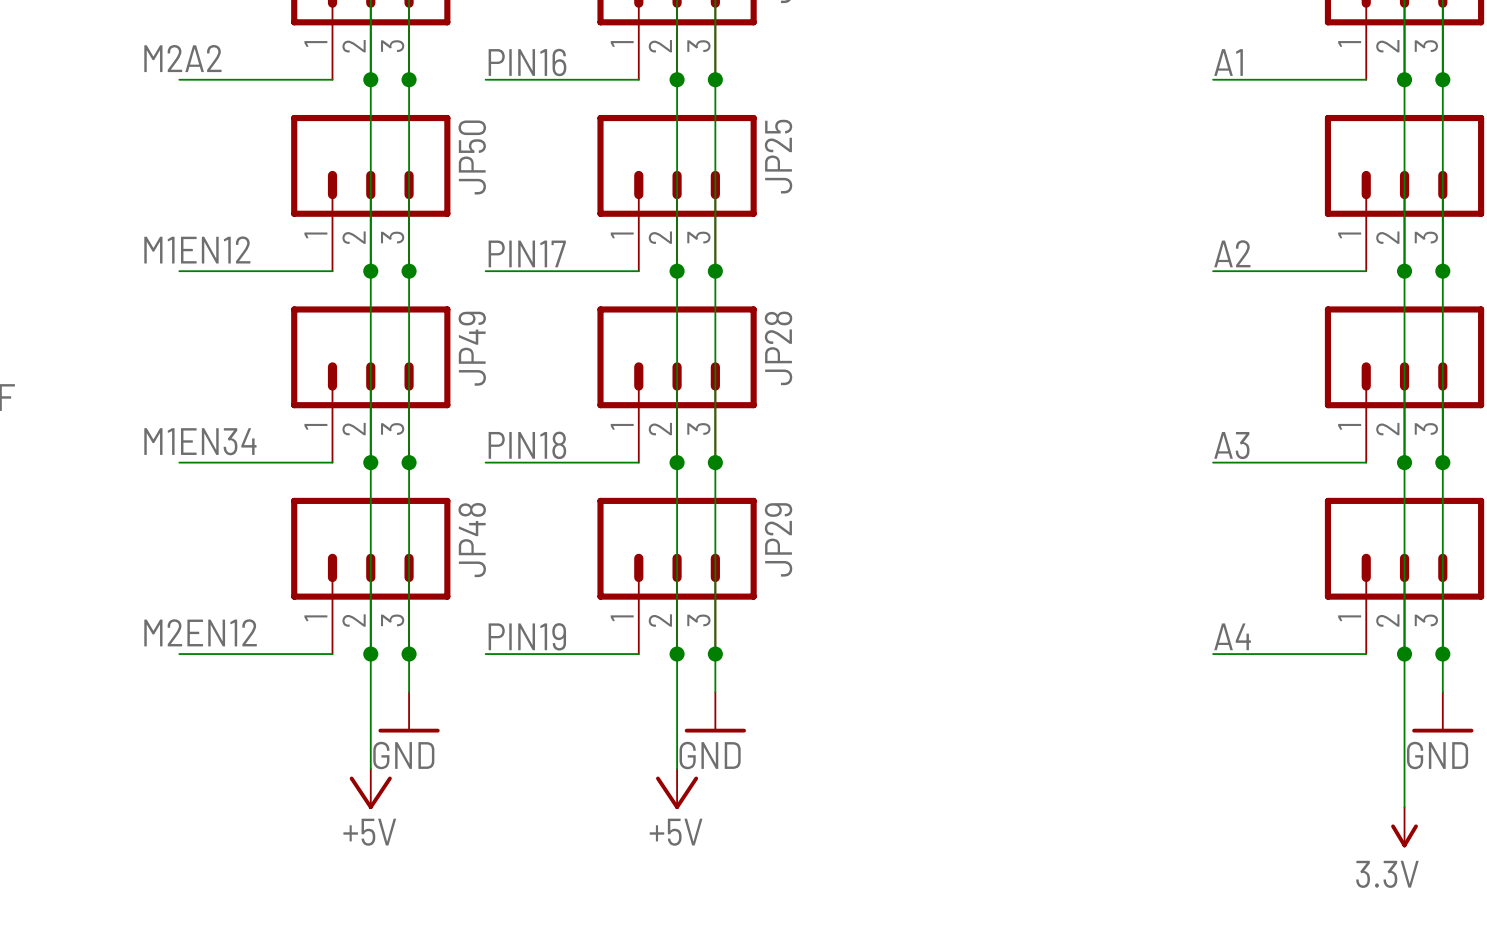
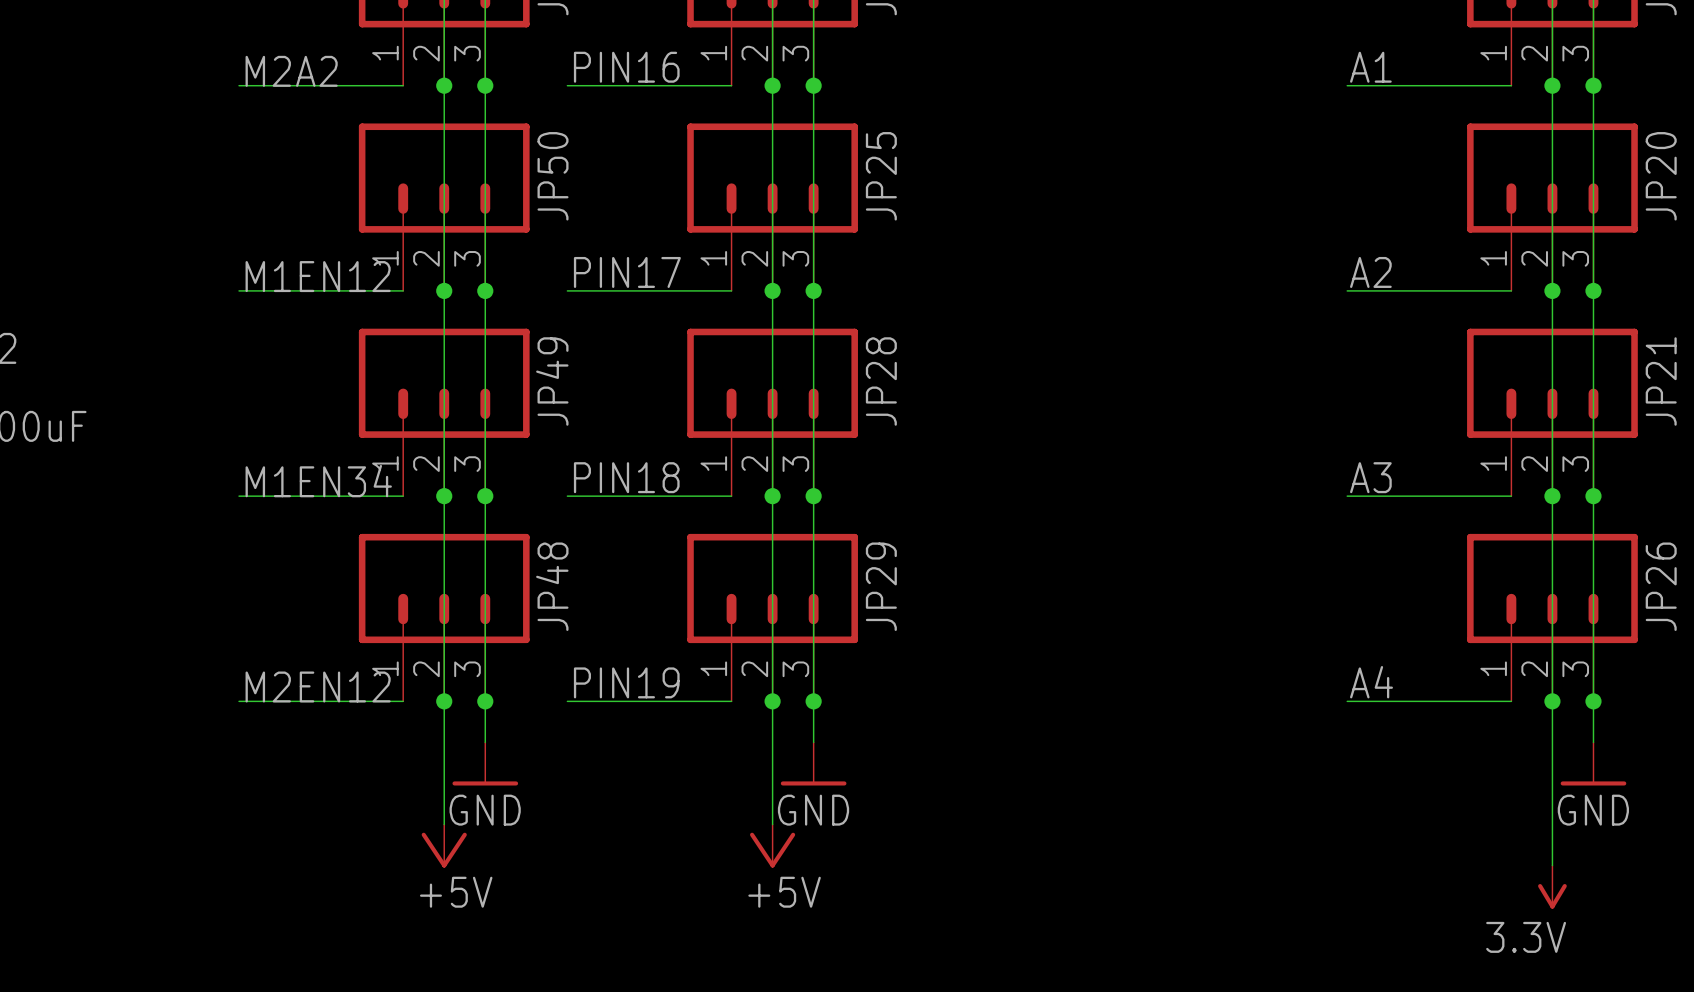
label position: M2A2 (182, 58) -> M2A2 (291, 71)
label position: M1EN12 (197, 249) -> M1EN12 (318, 276)
label position: M1EN34 (200, 441) -> M1EN34 (318, 481)
label position: M2EN12 (200, 632) -> M2EN12 (318, 687)

